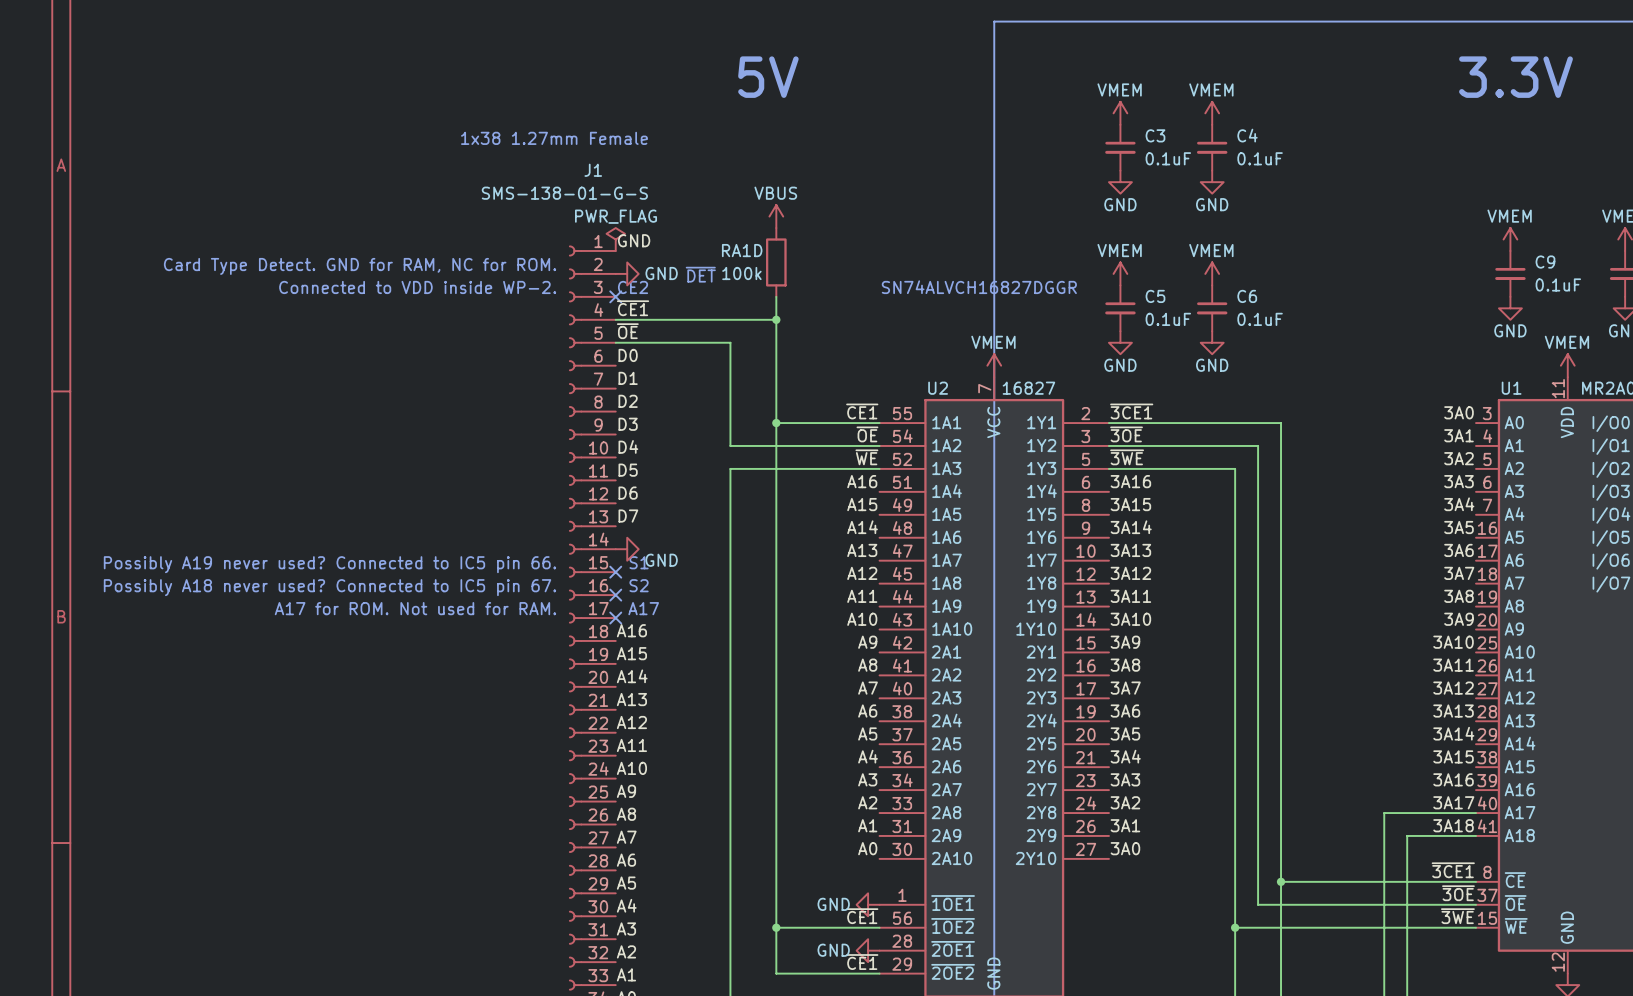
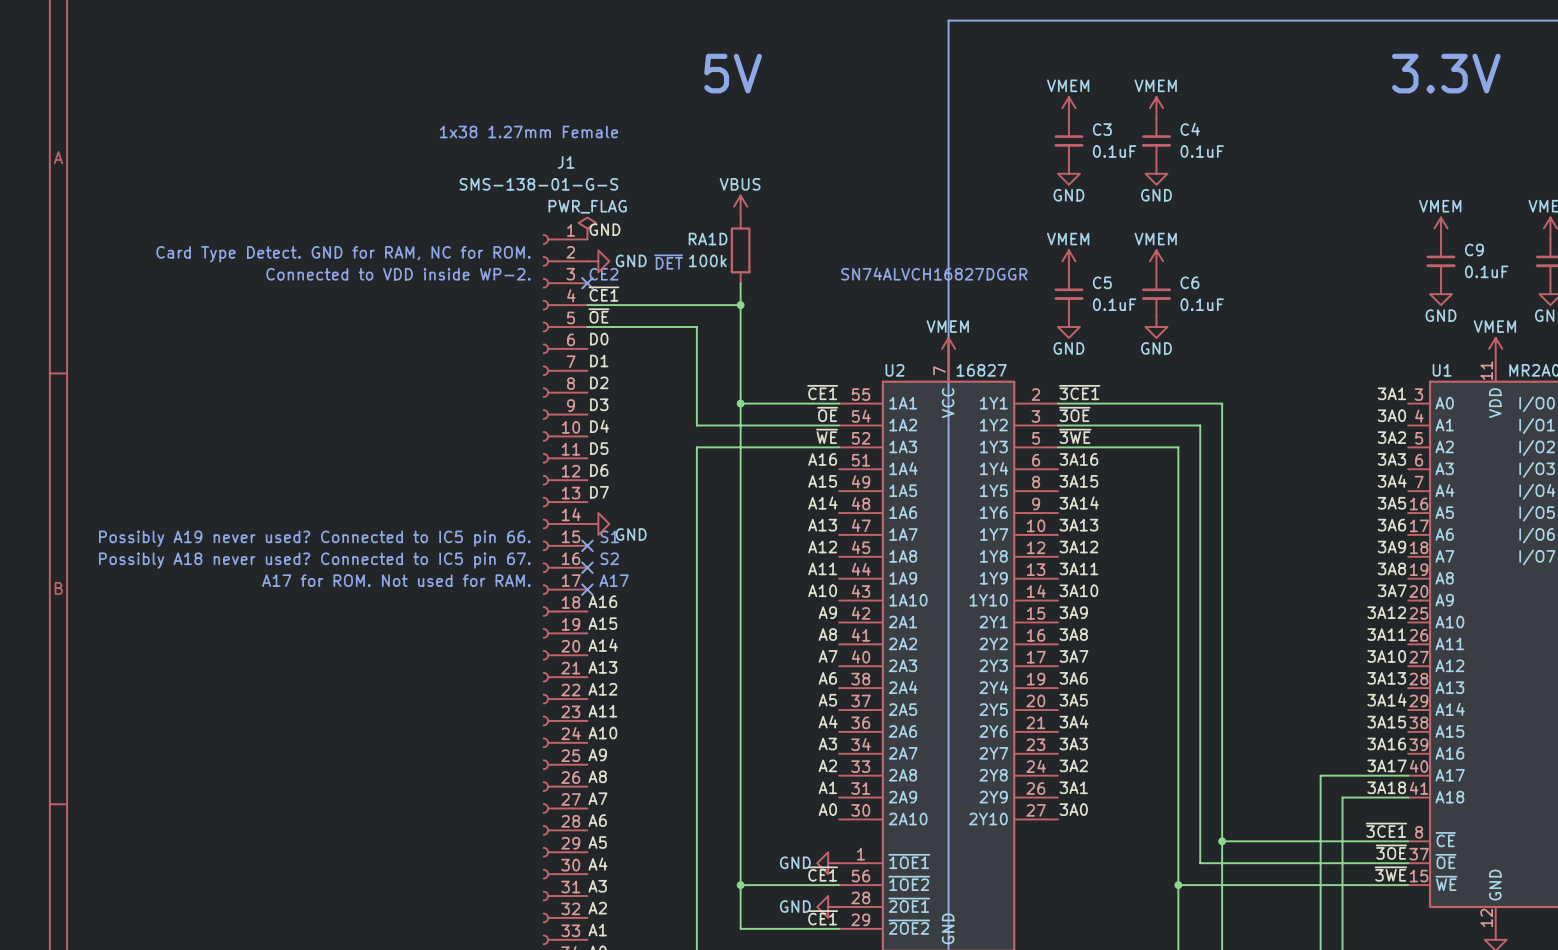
label: 3A0 (1458, 412) -> 3A1 (1391, 393)
label: 3A1 (1458, 435) -> 3A0 (1391, 415)
label: 3A7 (1459, 573) -> 3A9 (1391, 547)
label: 3A9 (1458, 619) -> 3A7 (1392, 590)
label: 3A10 (1453, 642) -> 3A12 (1386, 612)
label: 3A12 (1453, 688) -> 3A10 (1386, 656)

